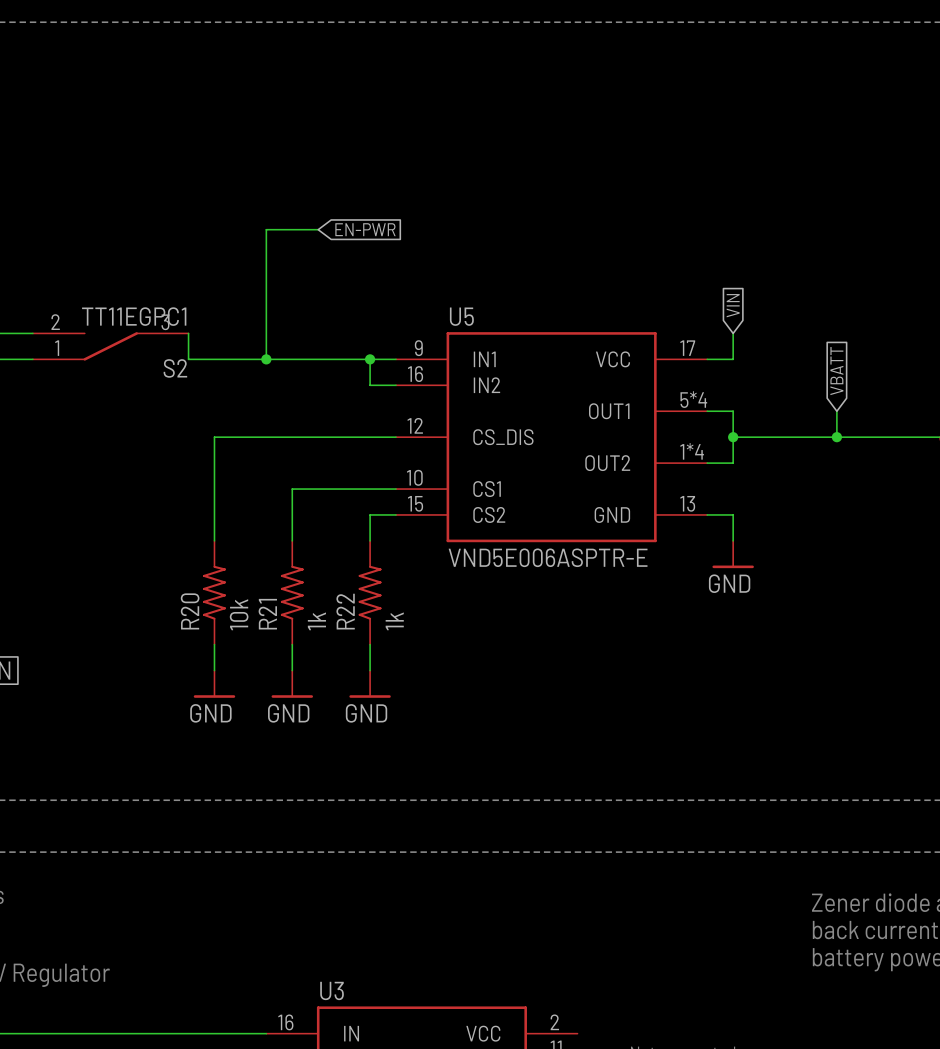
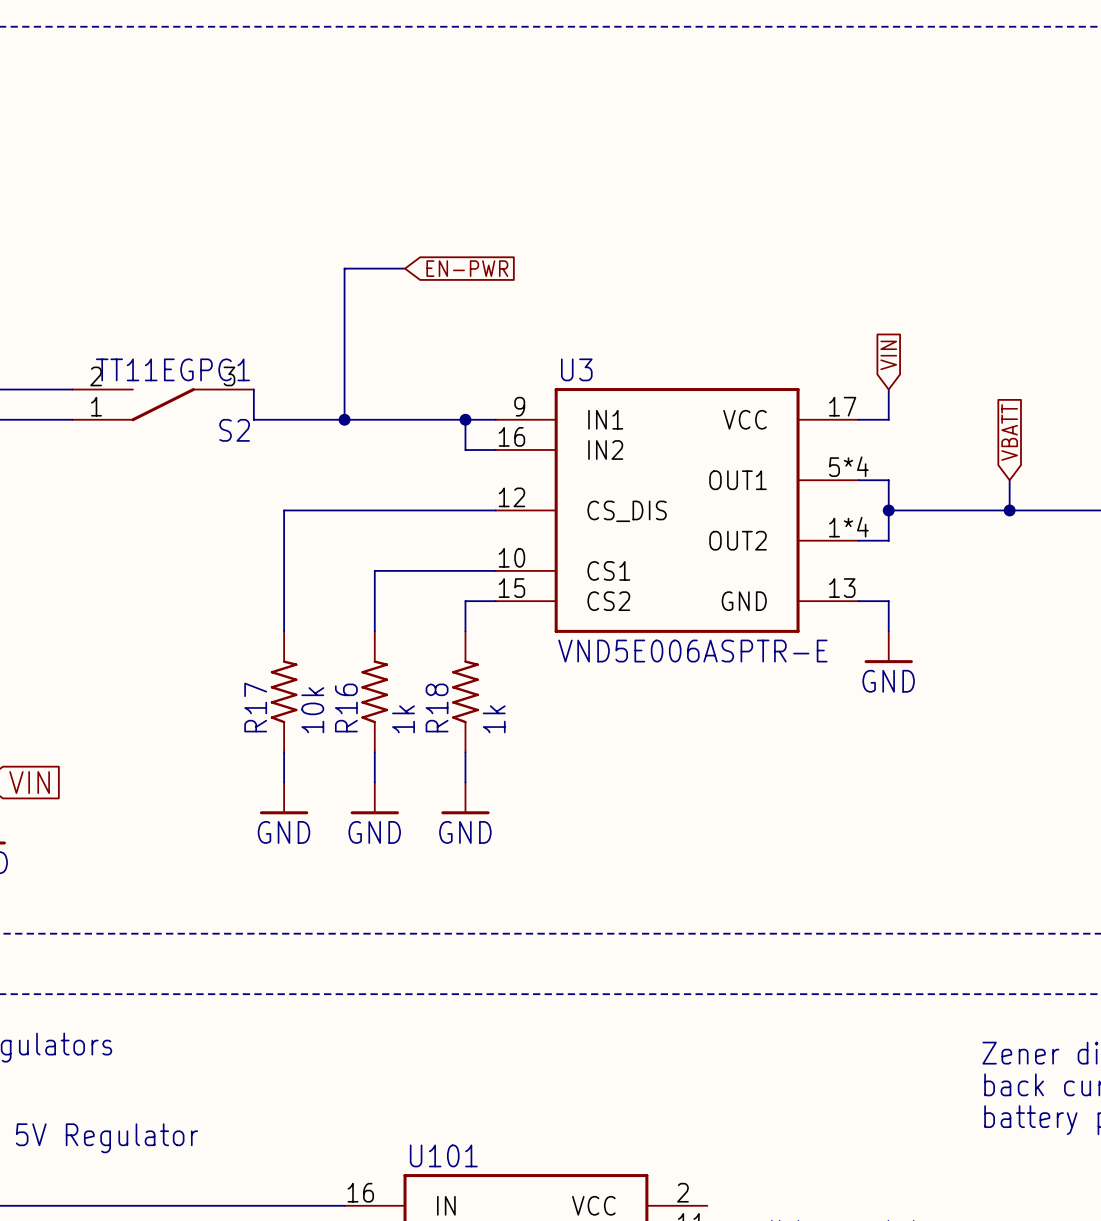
U5 name: U5 (461, 316) -> U3 (576, 369)
R20 name: R20 (190, 611) -> R17 (255, 707)
R22 name: R22 (345, 611) -> R18 (437, 707)
R21 name: R21 (267, 614) -> R16 (346, 707)
U3 name: U3 (332, 990) -> U101 (443, 1155)

